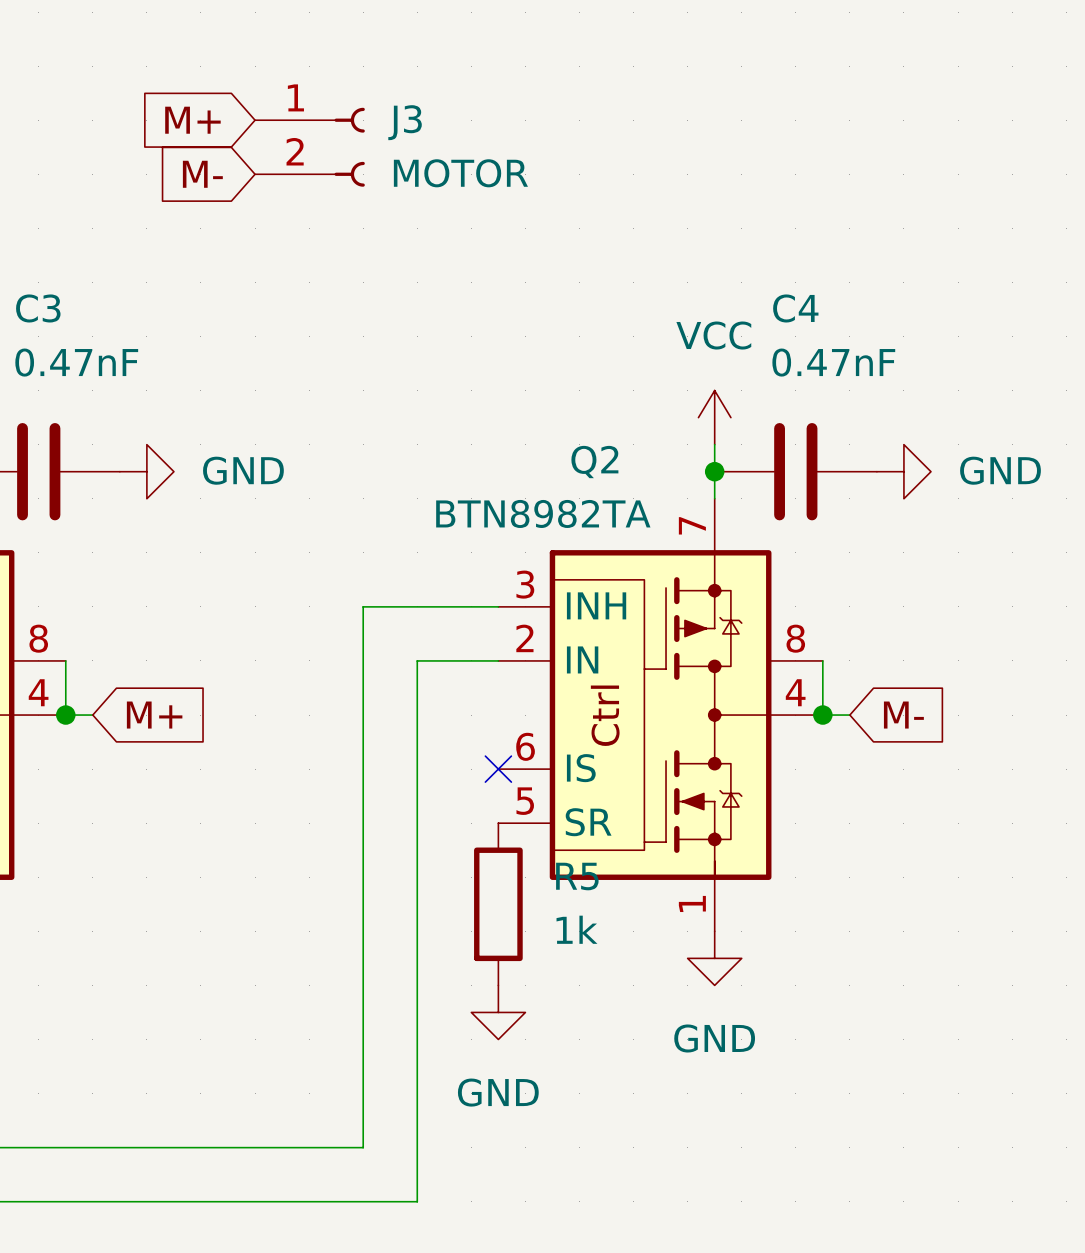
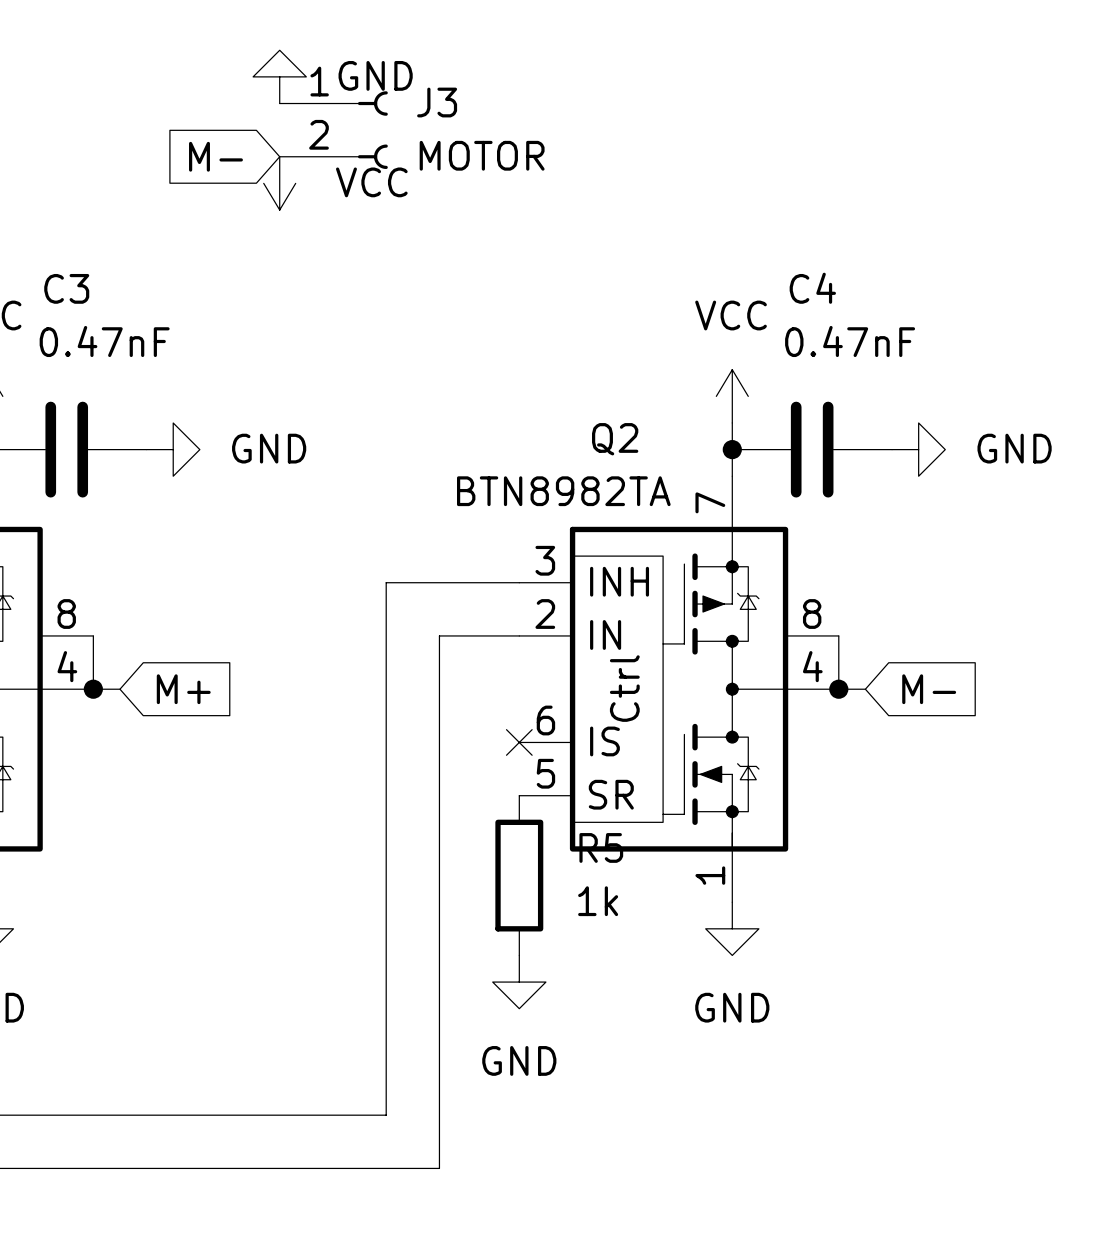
power symbol: none -> GND (279, 76)
global label: M+ (192, 120) -> none
power symbol: none -> VCC (279, 183)

